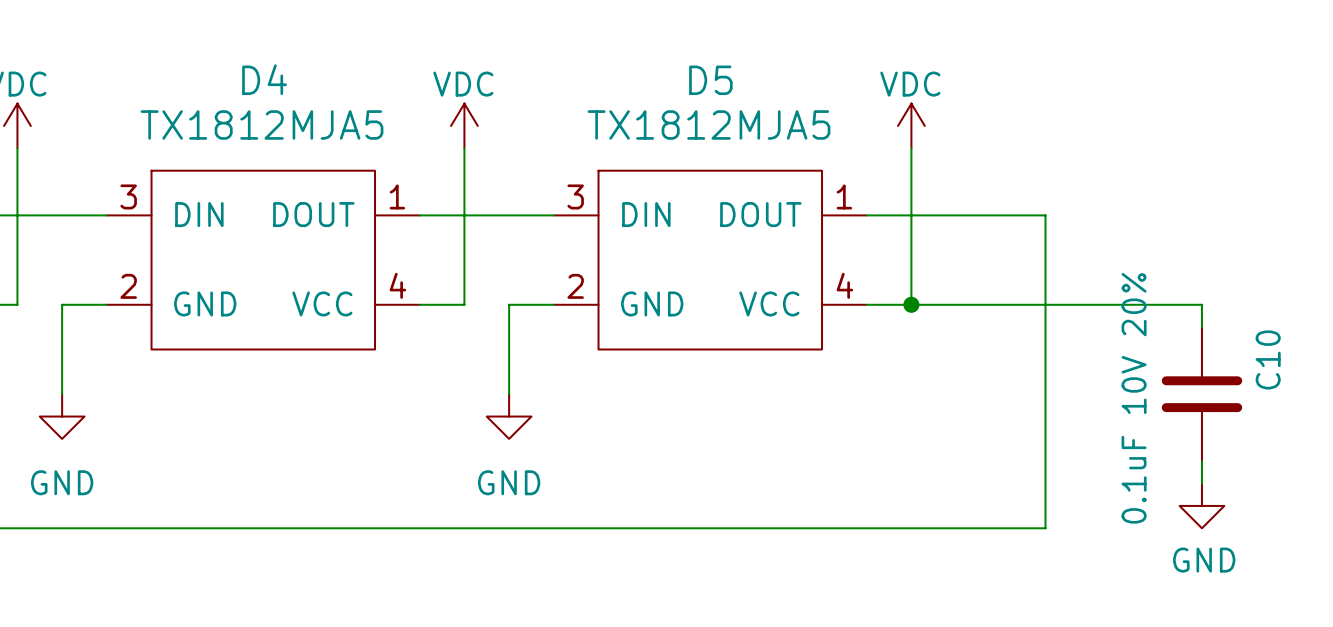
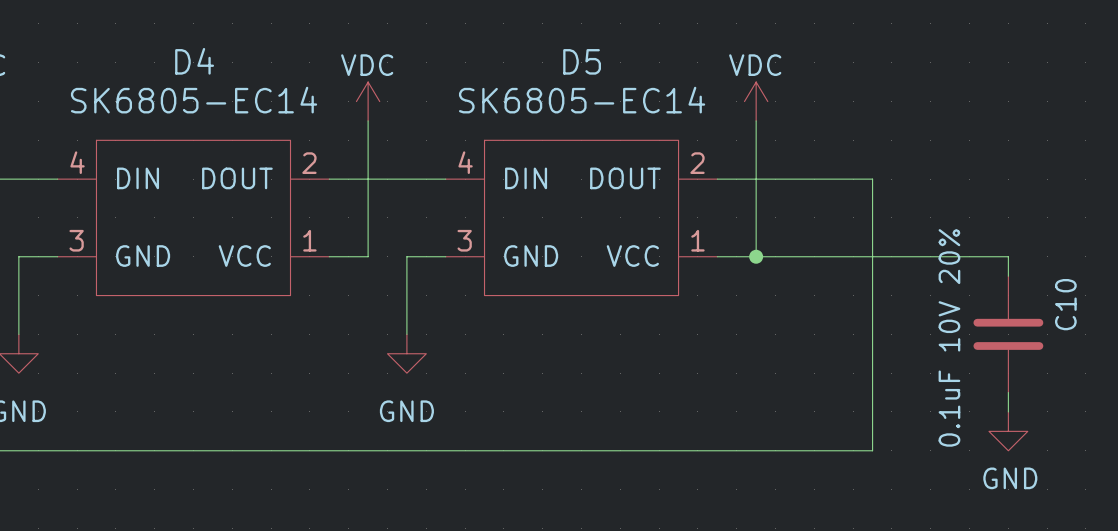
D4 value: TX1812MJA5 (262, 124) -> SK6805-EC14 (194, 100)
D5 value: TX1812MJA5 (708, 124) -> SK6805-EC14 (582, 100)
D4 pin number: 3 (128, 196) -> 4 (77, 162)
D4 pin number: 1 (397, 196) -> 2 (309, 163)
D5 pin number: 3 (575, 196) -> 4 (465, 162)
D5 pin number: 1 (844, 196) -> 2 (697, 163)
D4 pin number: 4 (397, 285) -> 1 (309, 240)
D5 pin number: 4 (844, 285) -> 1 (697, 240)
D4 pin number: 2 (128, 286) -> 3 (76, 240)
D5 pin number: 2 (575, 286) -> 3 (464, 240)

